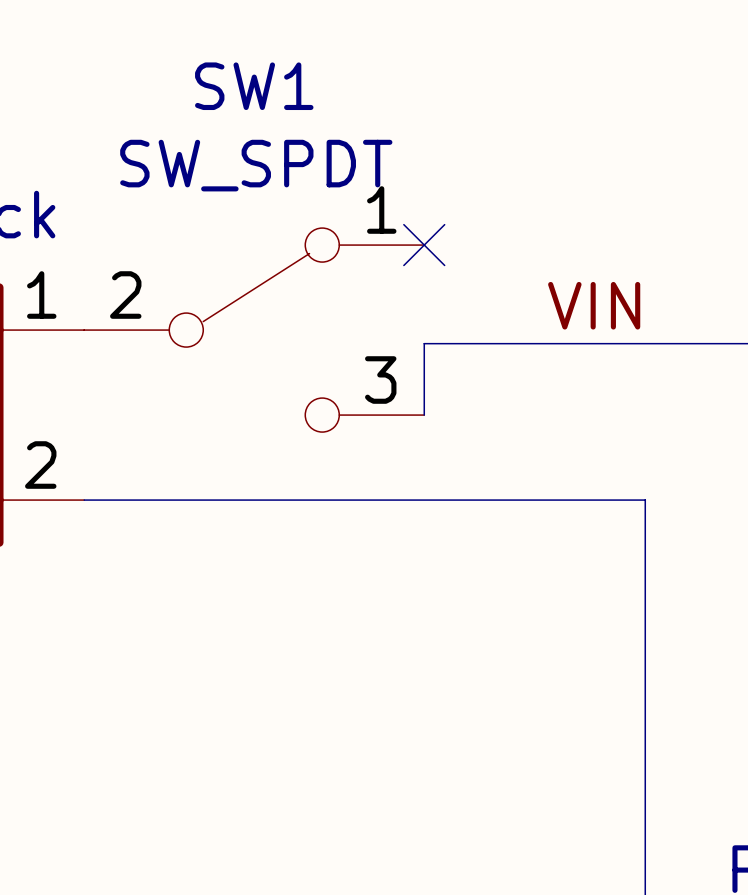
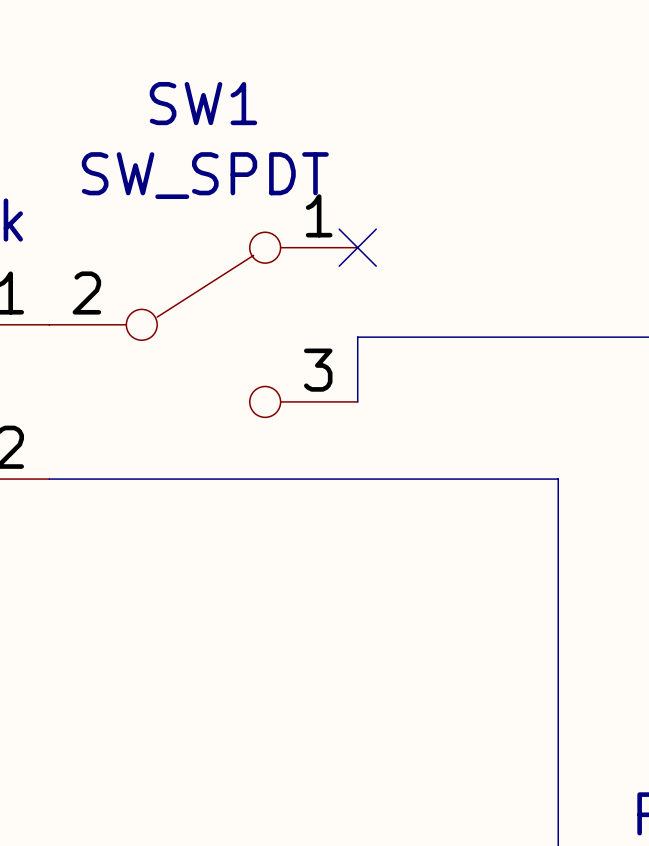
label: VIN (594, 305) -> none

